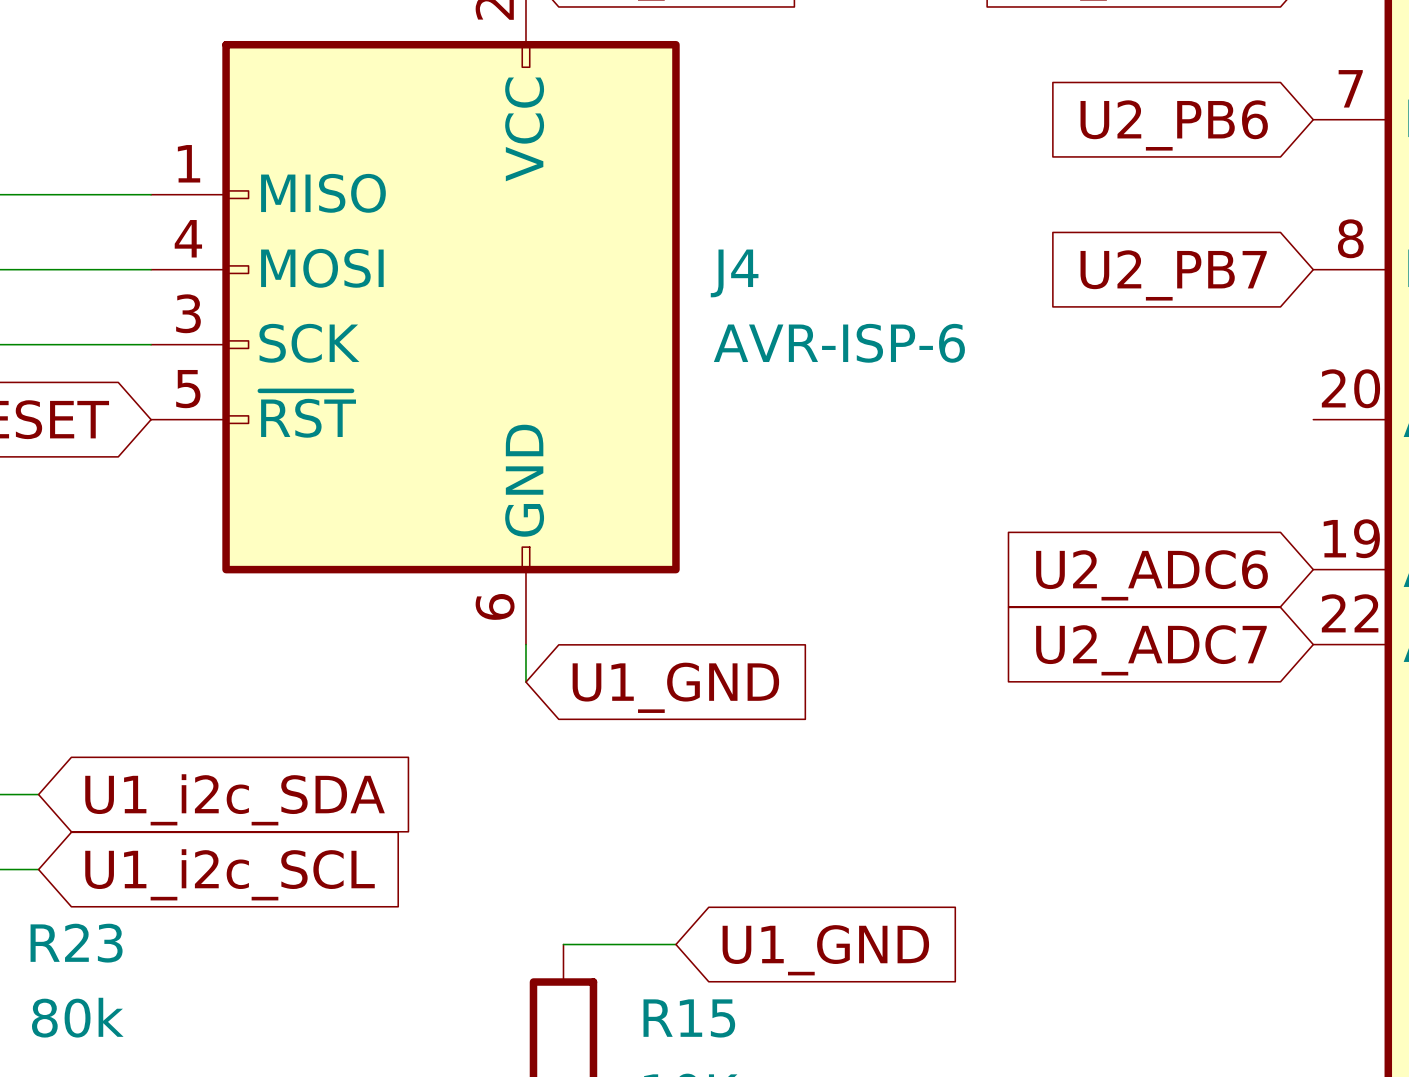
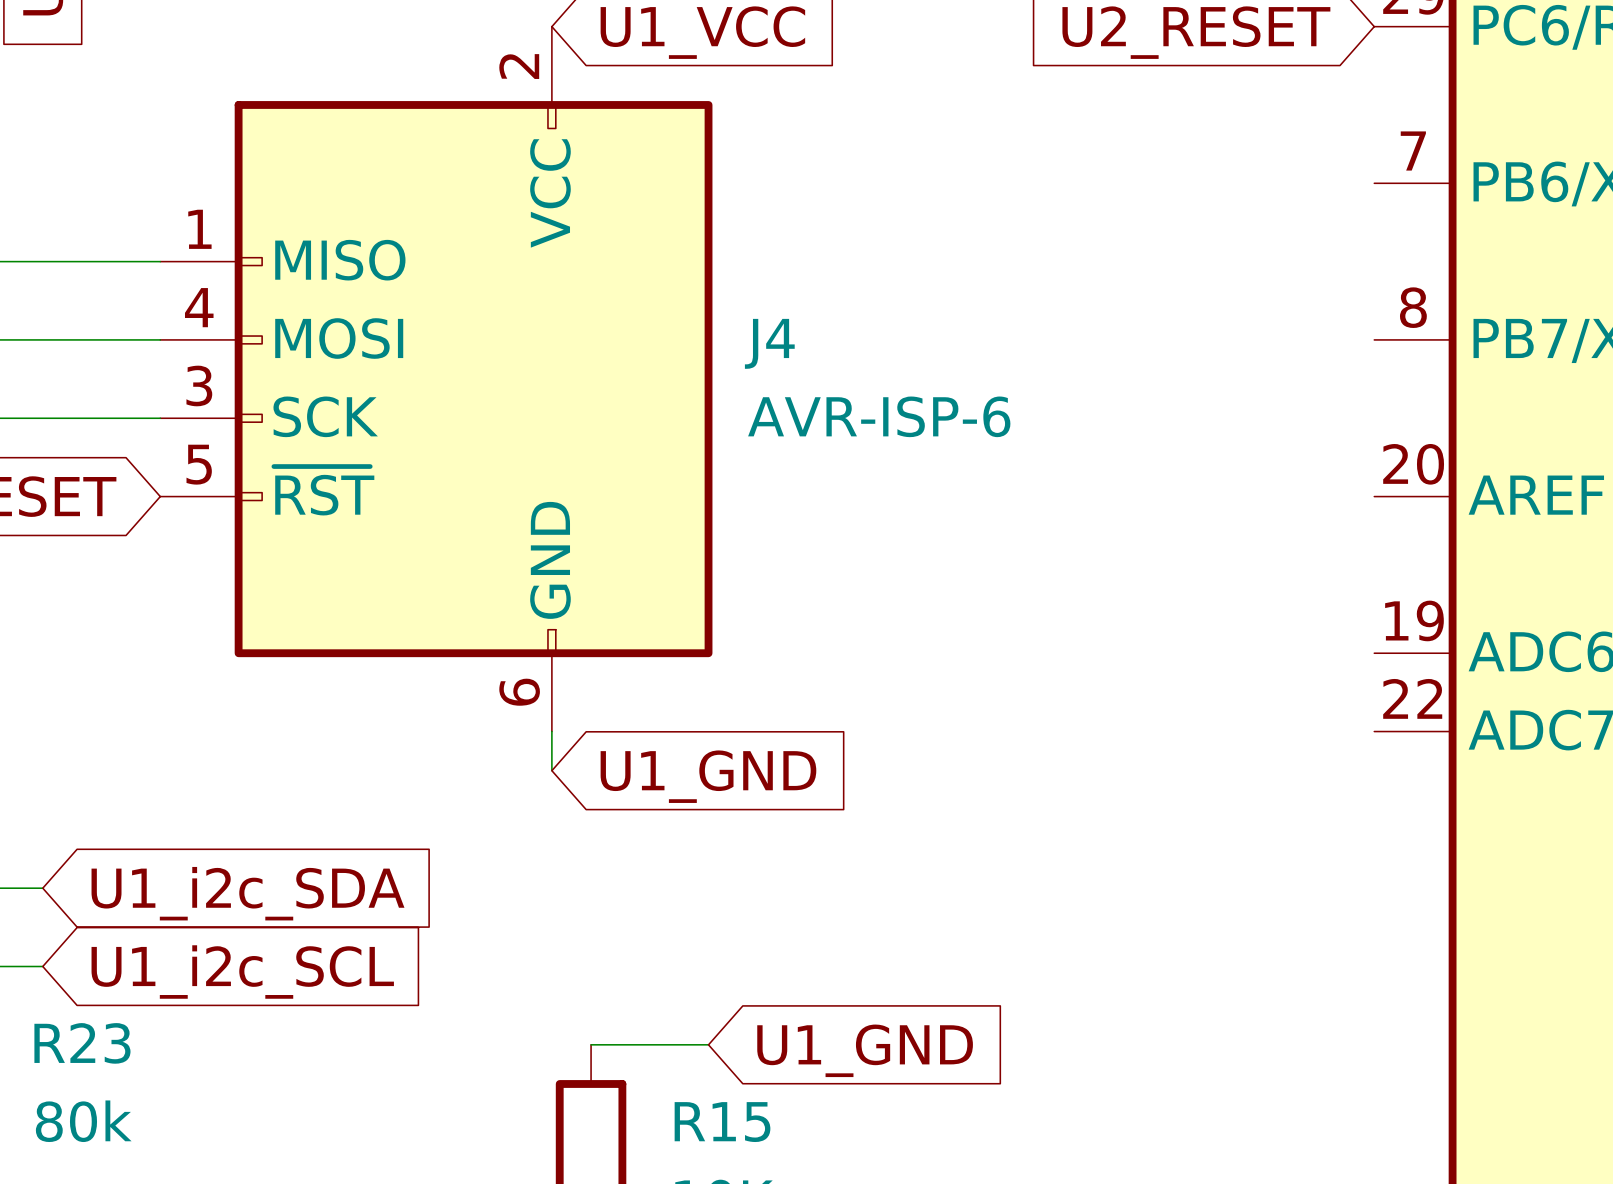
global label: U2_PB6 (1174, 125) -> none
global label: U2_PB7 (1173, 275) -> none
global label: U2_ADC6 (1152, 575) -> none
global label: U2_ADC7 (1151, 650) -> none

